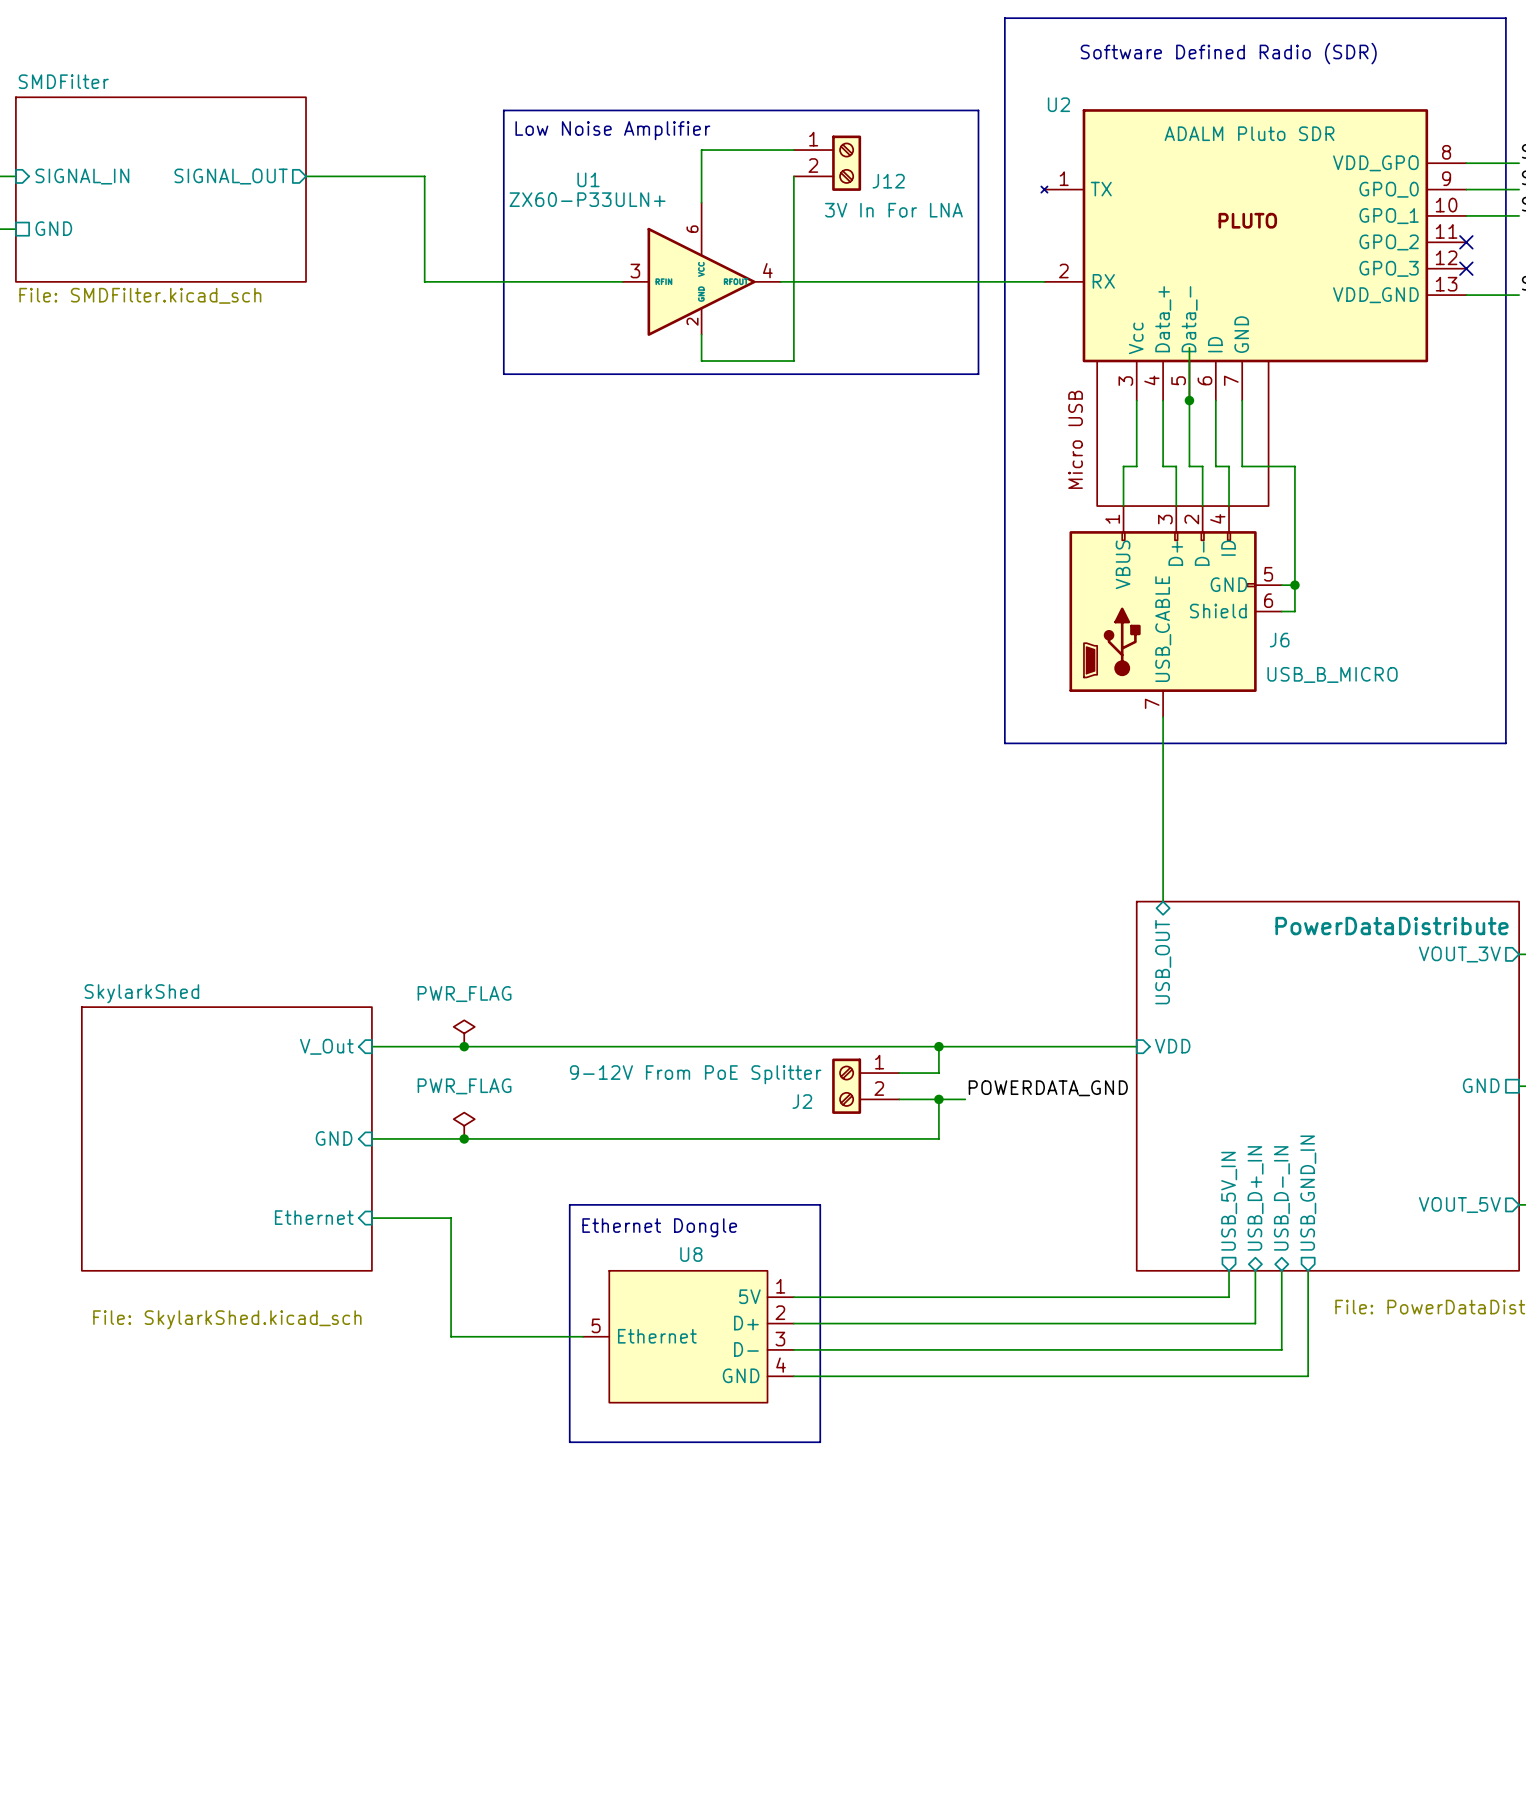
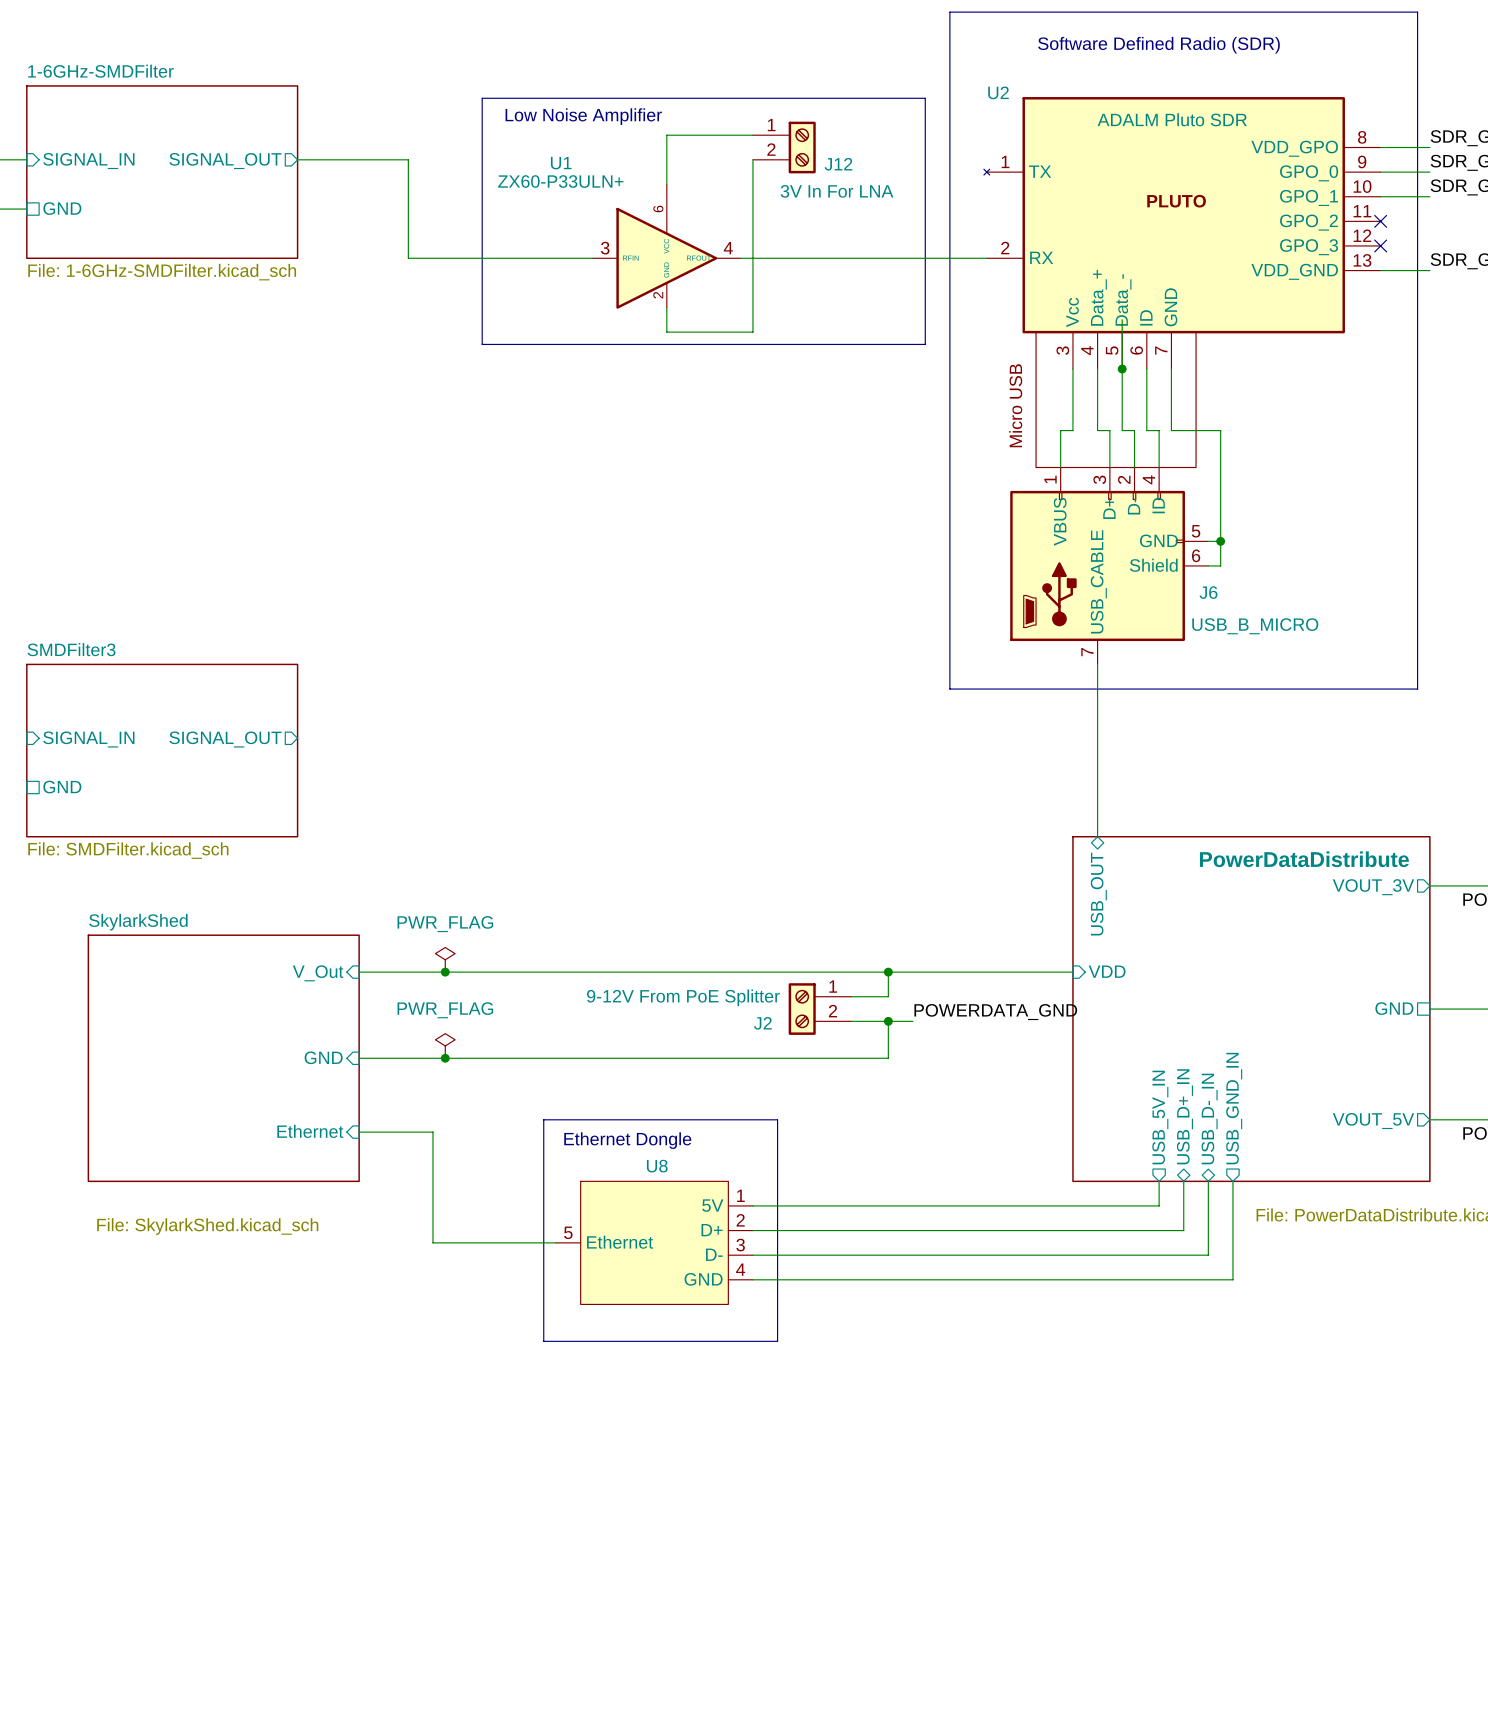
sheet SMDFilter name: SMDFilter (63, 81) -> 1-6GHz-SMDFilter (100, 71)
sheet SMDFilter value: File: SMDFilter.kicad_sch (140, 295) -> File: 1-6GHz-SMDFilter.kicad_sch (162, 272)
sheet pin: none -> SIGNAL_IN (88, 739)
sheet pin: none -> SIGNAL_OUT (225, 739)
sheet SMDFilter3: none -> File: SMDFilter.kicad_sch (162, 750)
sheet pin: none -> GND (62, 787)

